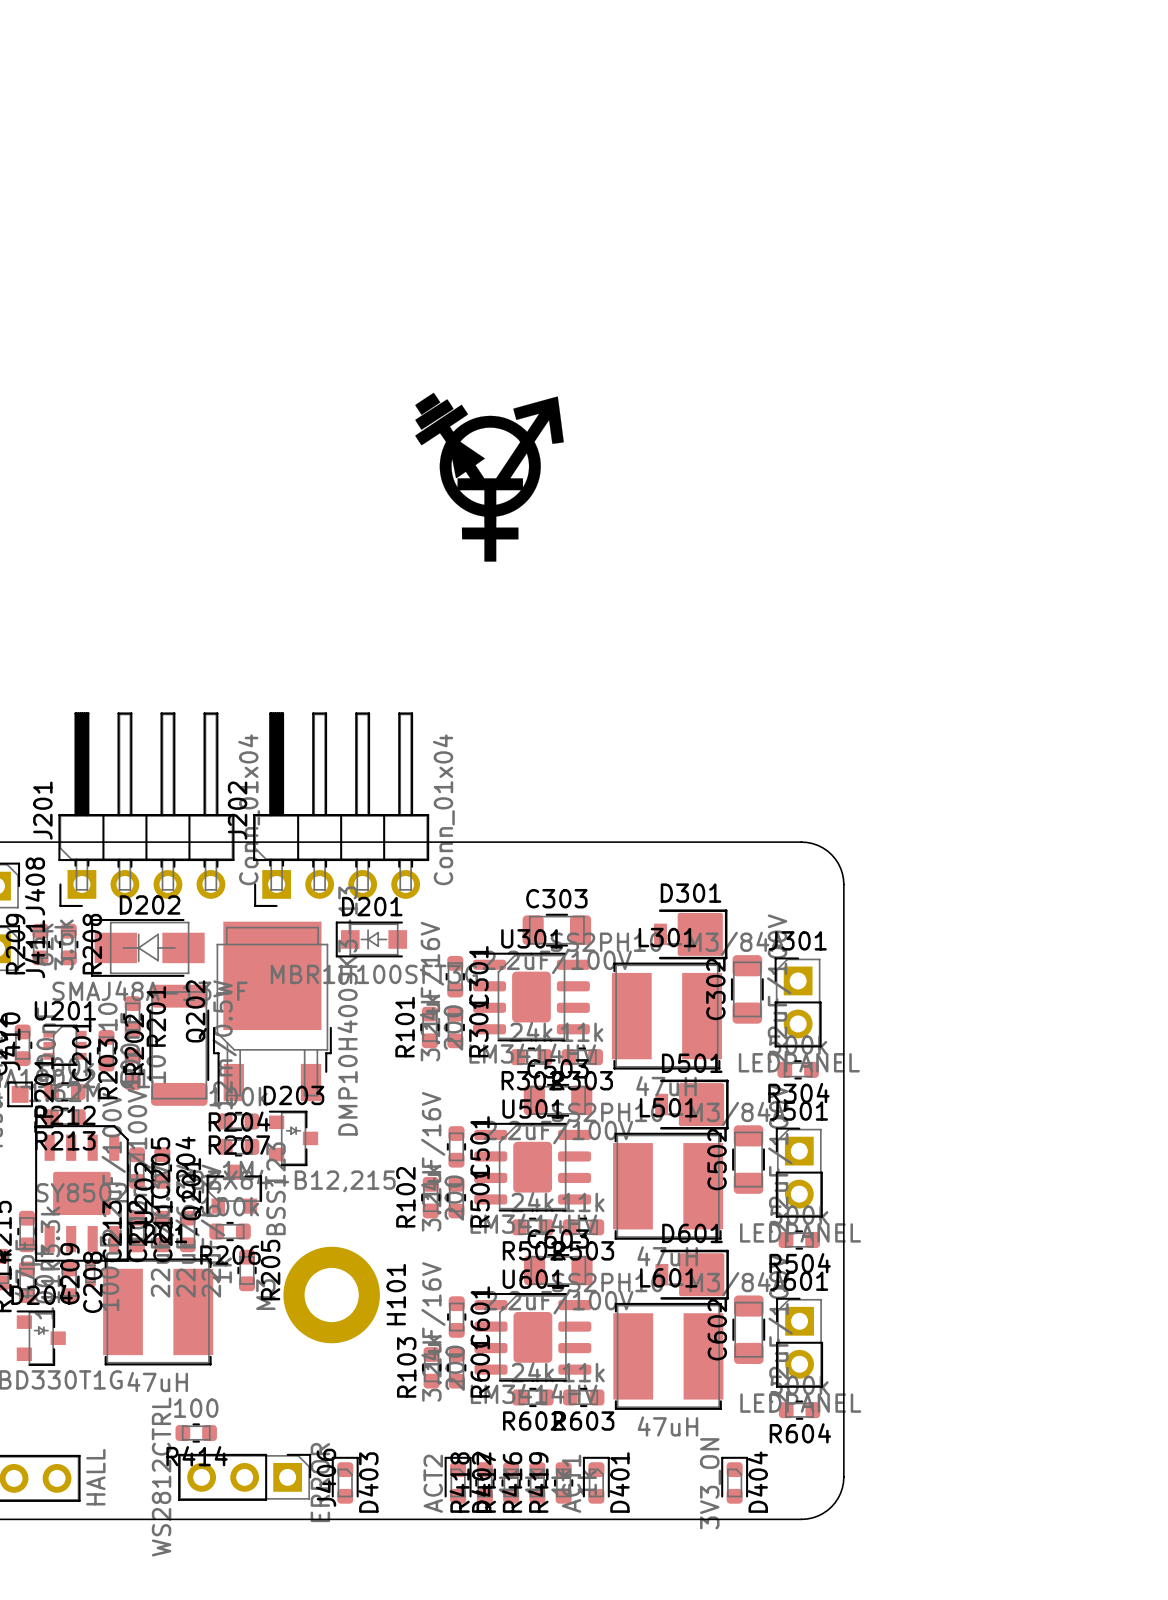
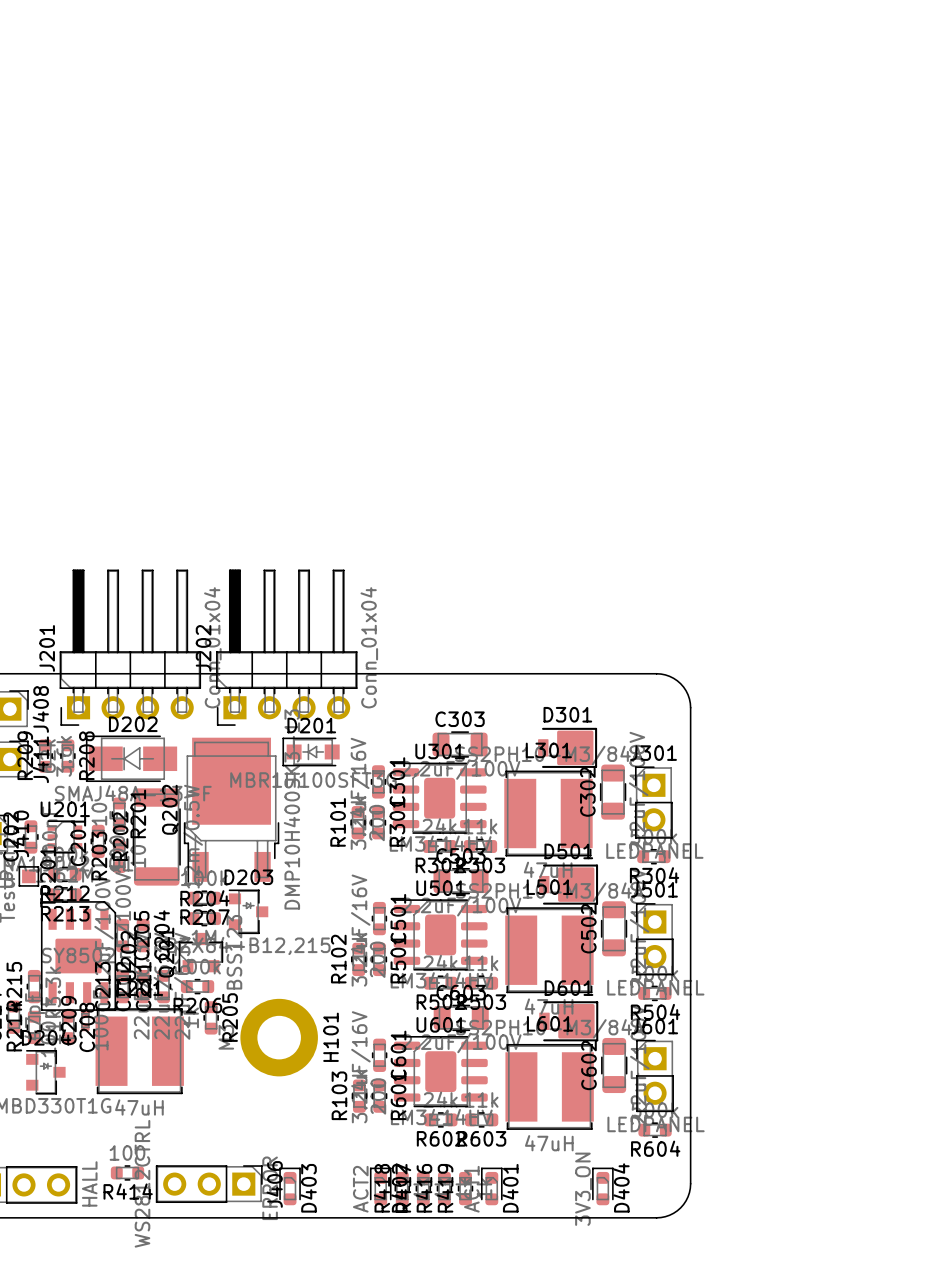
drawing: [415, 392, 564, 562] -> none
R414 position: (196, 1433) -> (127, 1172)

